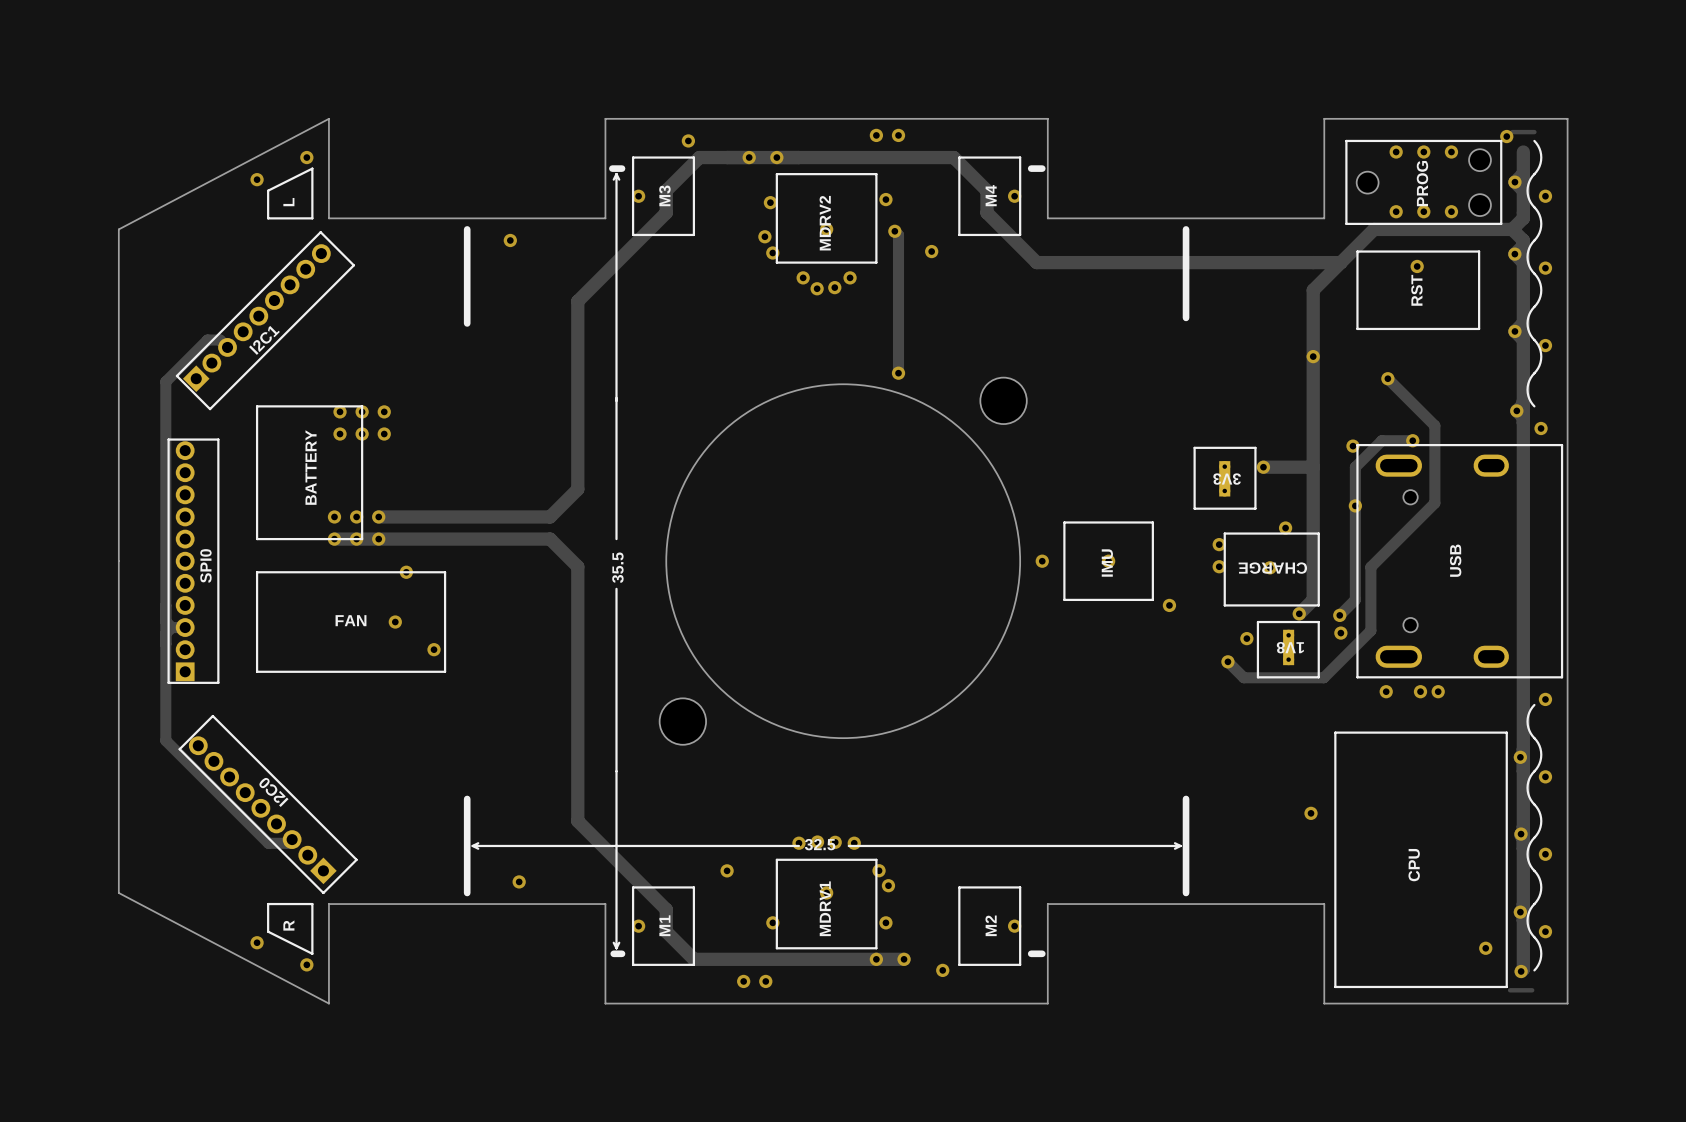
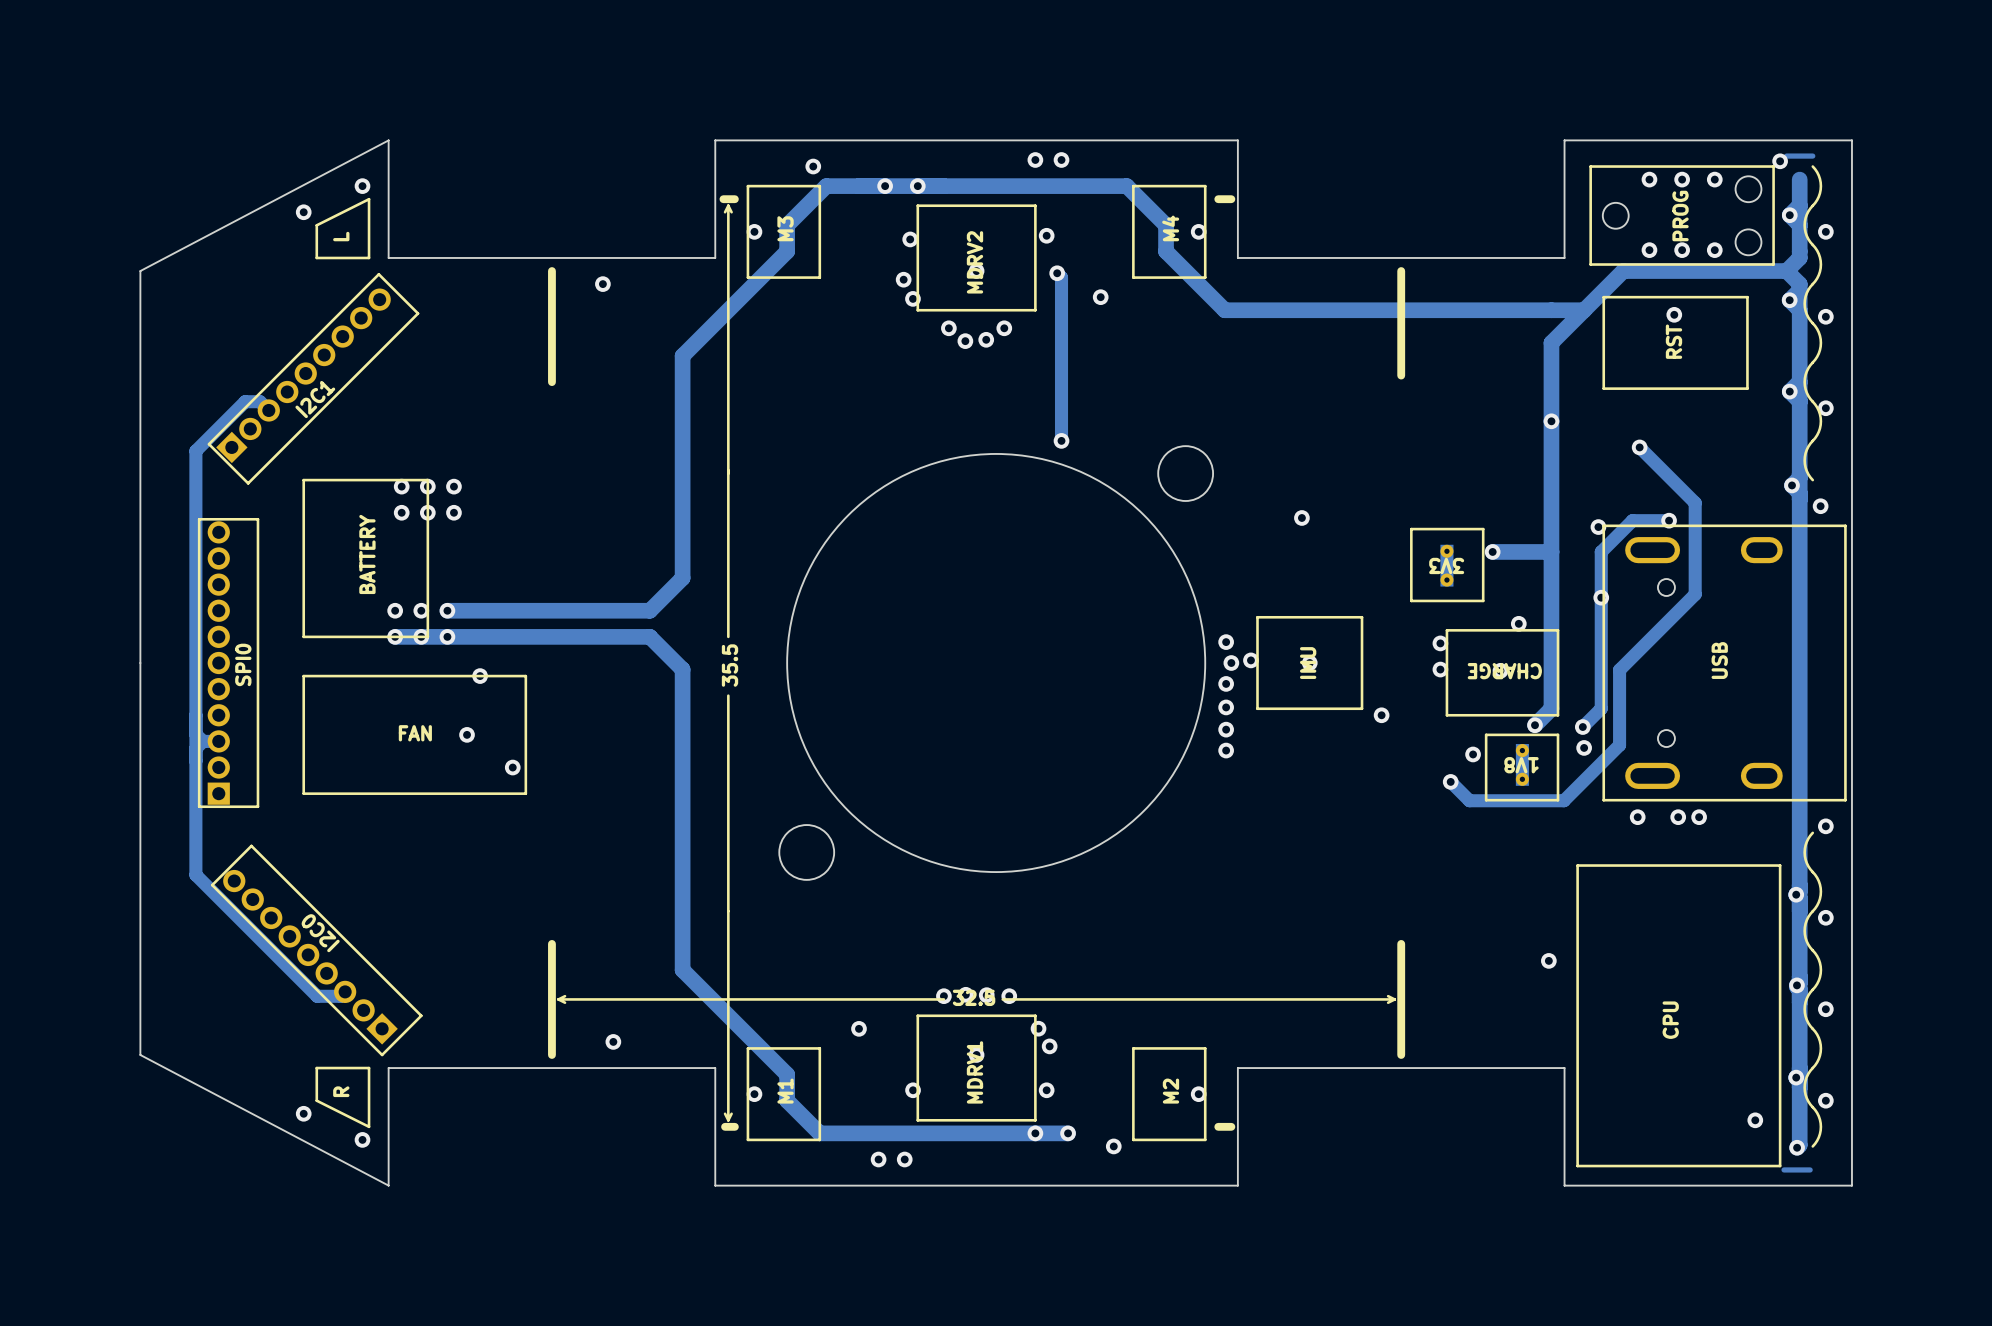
via: none -> (1301, 517)
via: none -> (1226, 642)
via: none -> (1250, 660)
via: none -> (1226, 683)
via: none -> (1226, 707)
via: none -> (1226, 729)
via: none -> (1226, 750)

